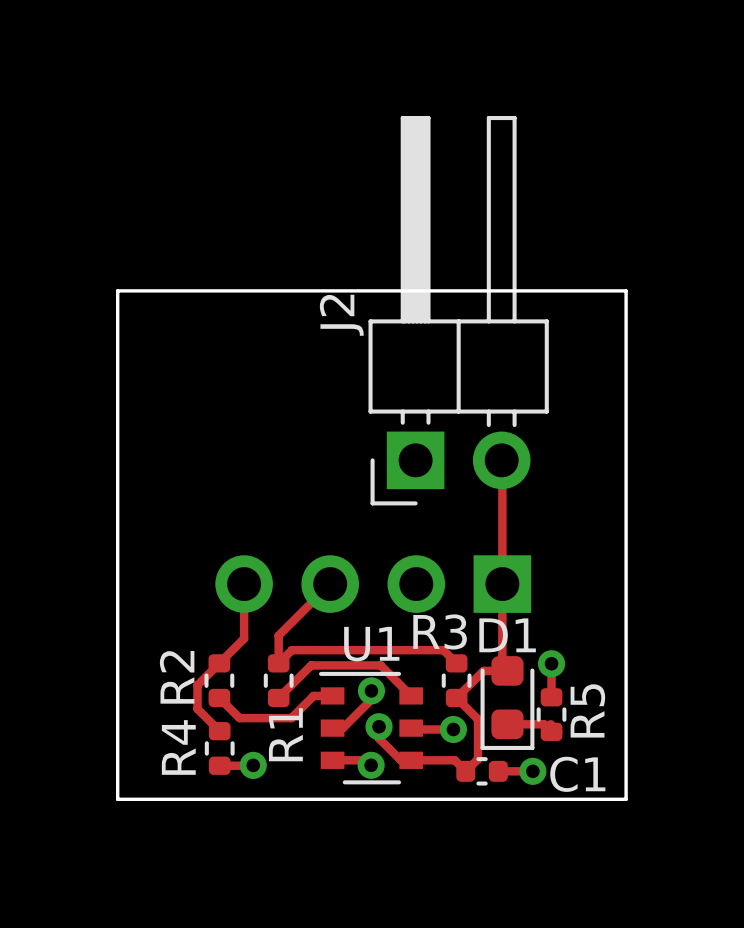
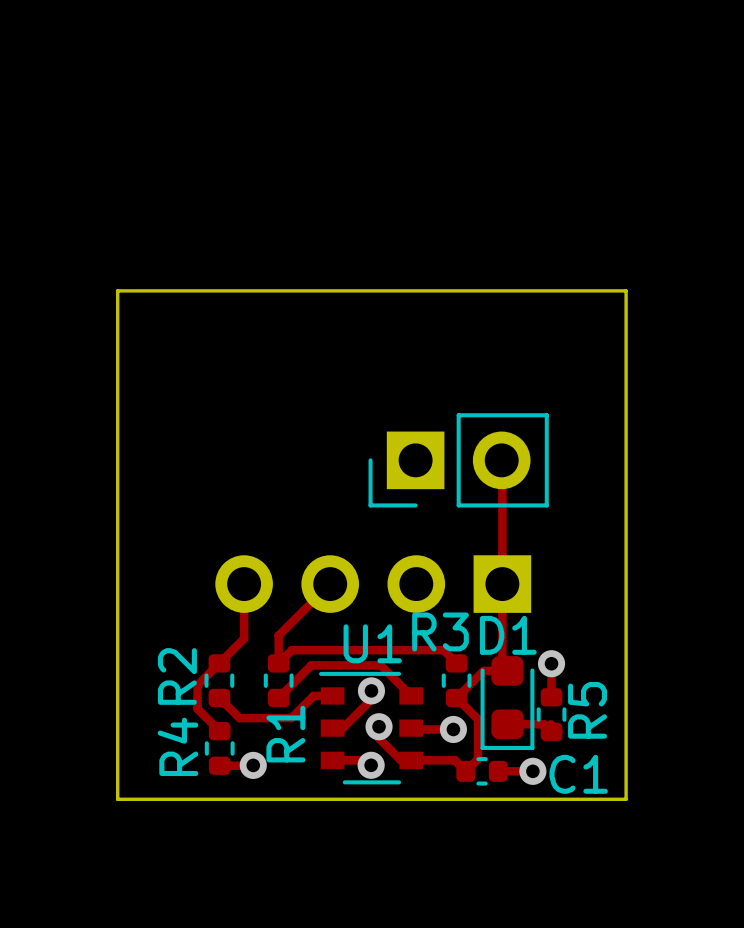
J2: (458, 310) -> none
part: none -> (458, 460)

